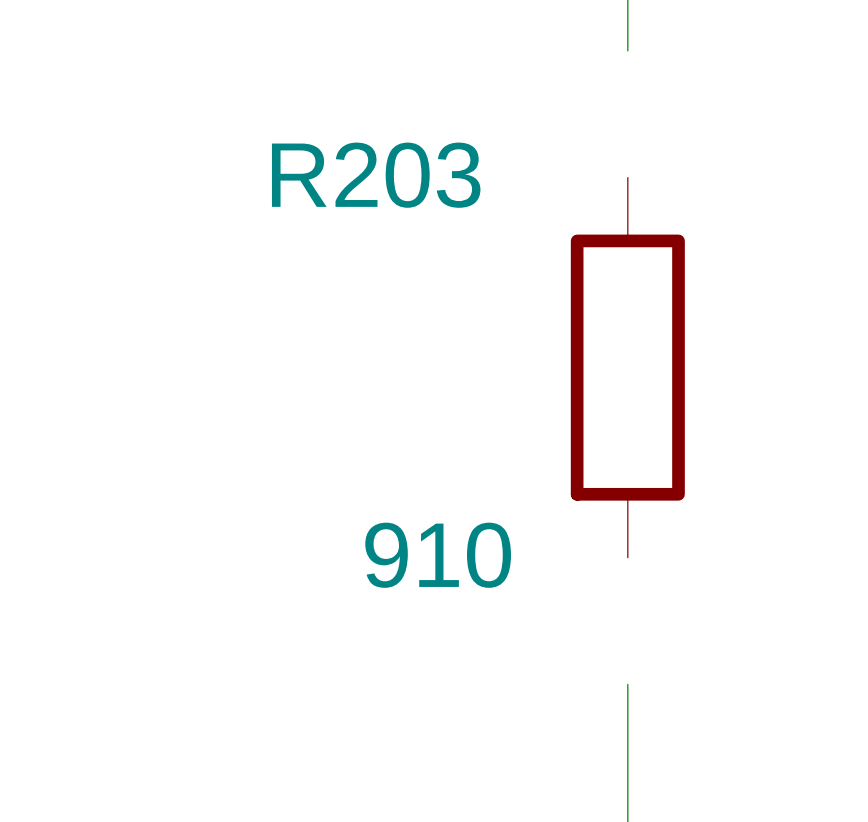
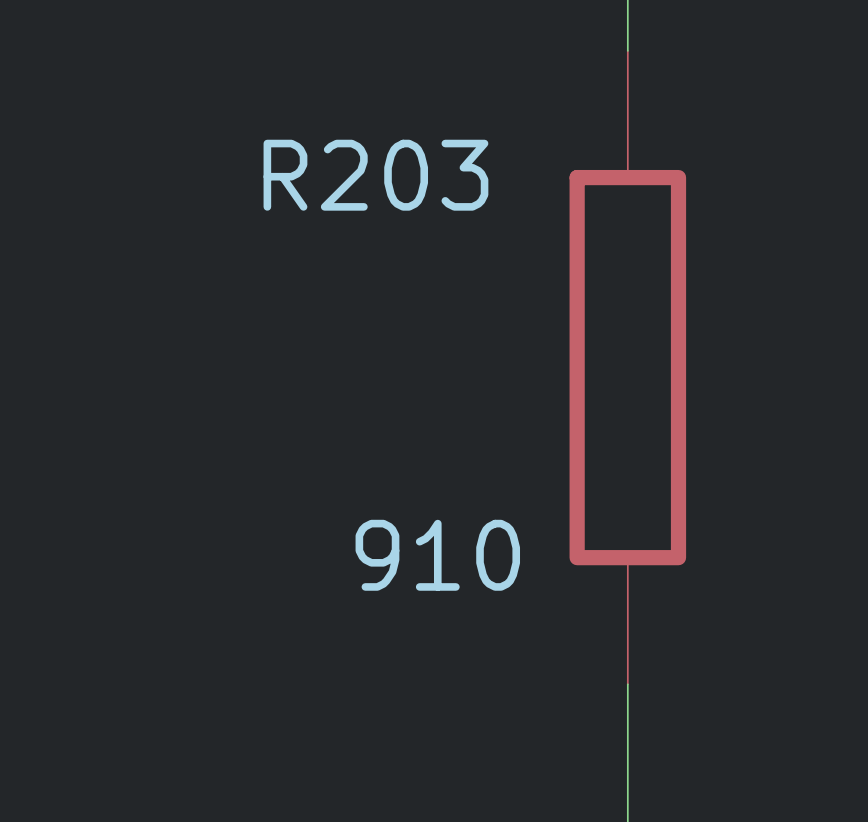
R203 symbol: [570, 177, 685, 558] -> [569, 50, 687, 685]

